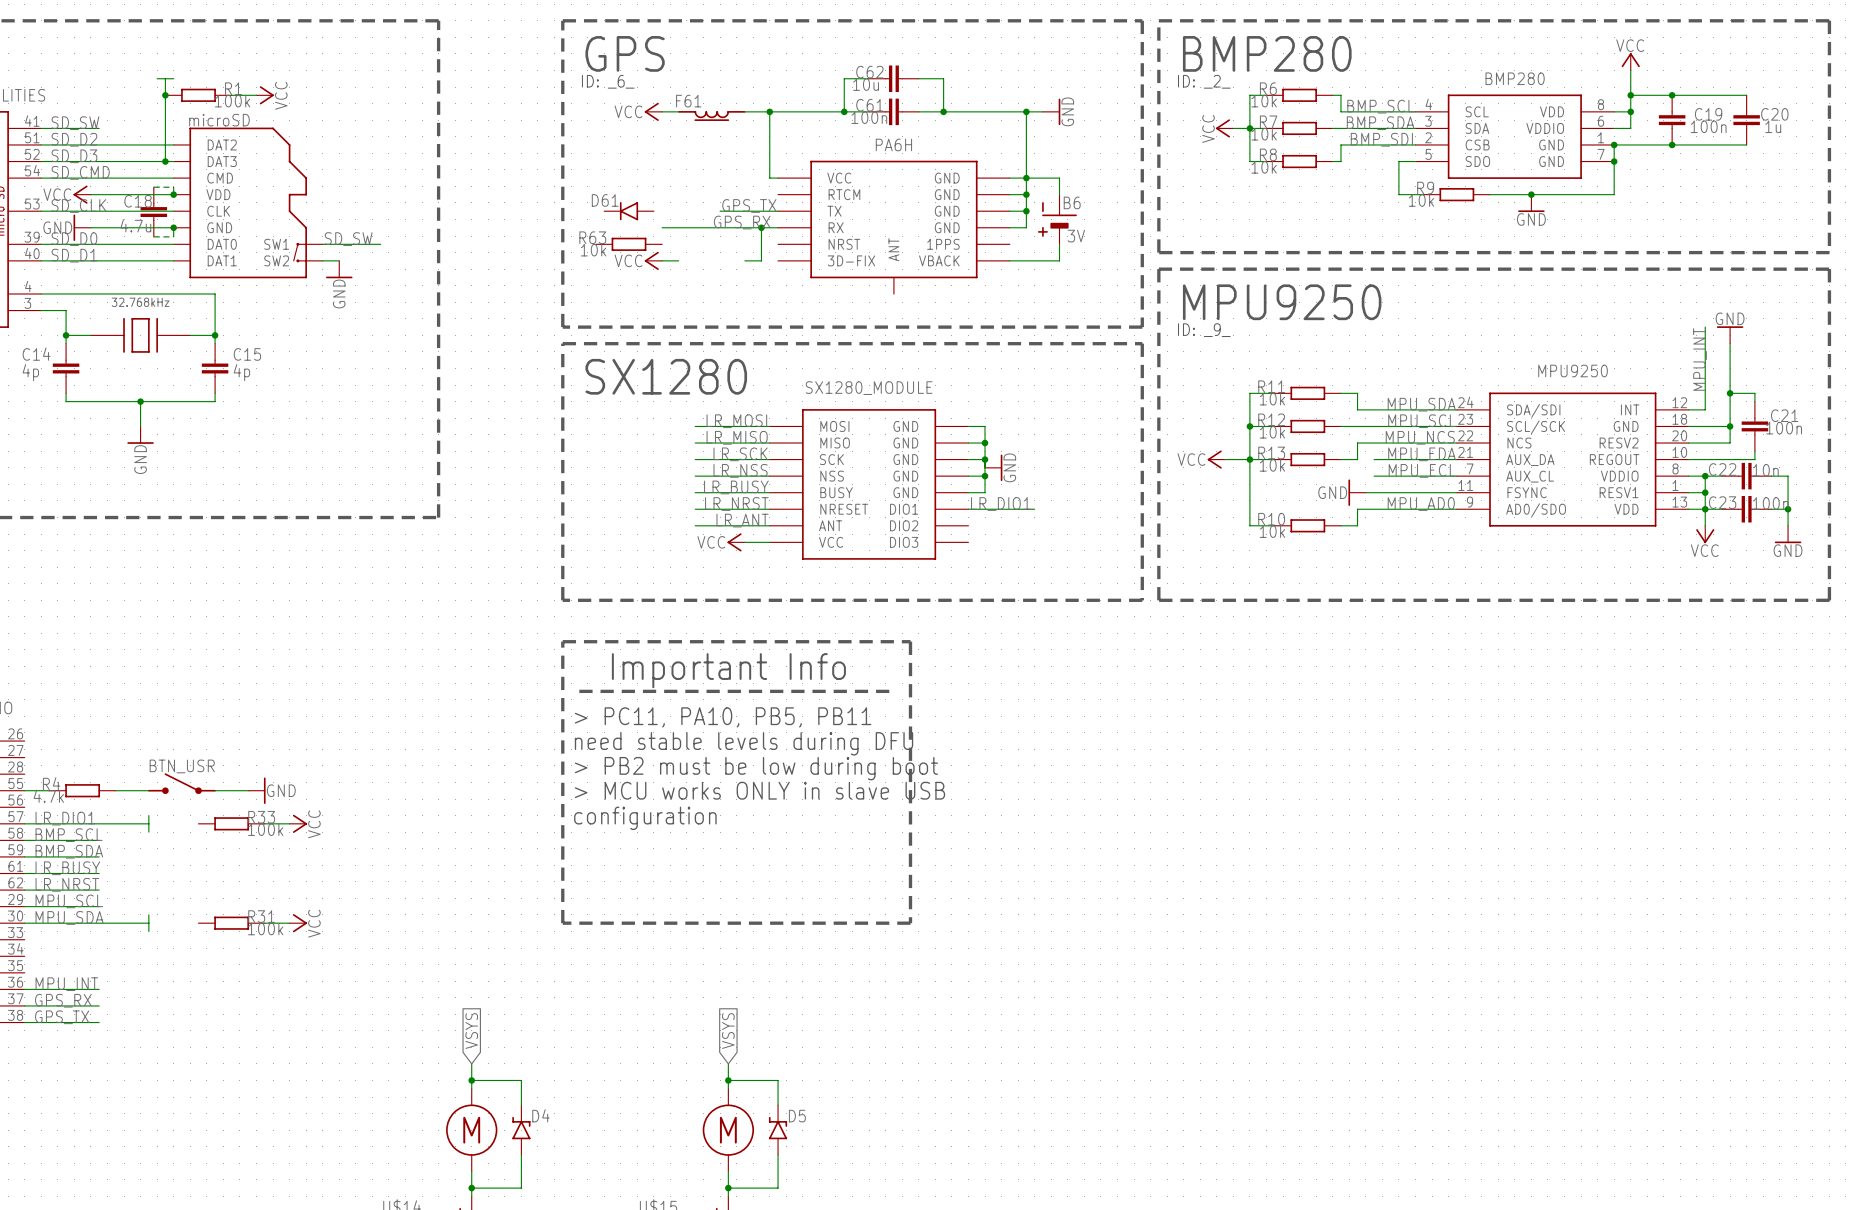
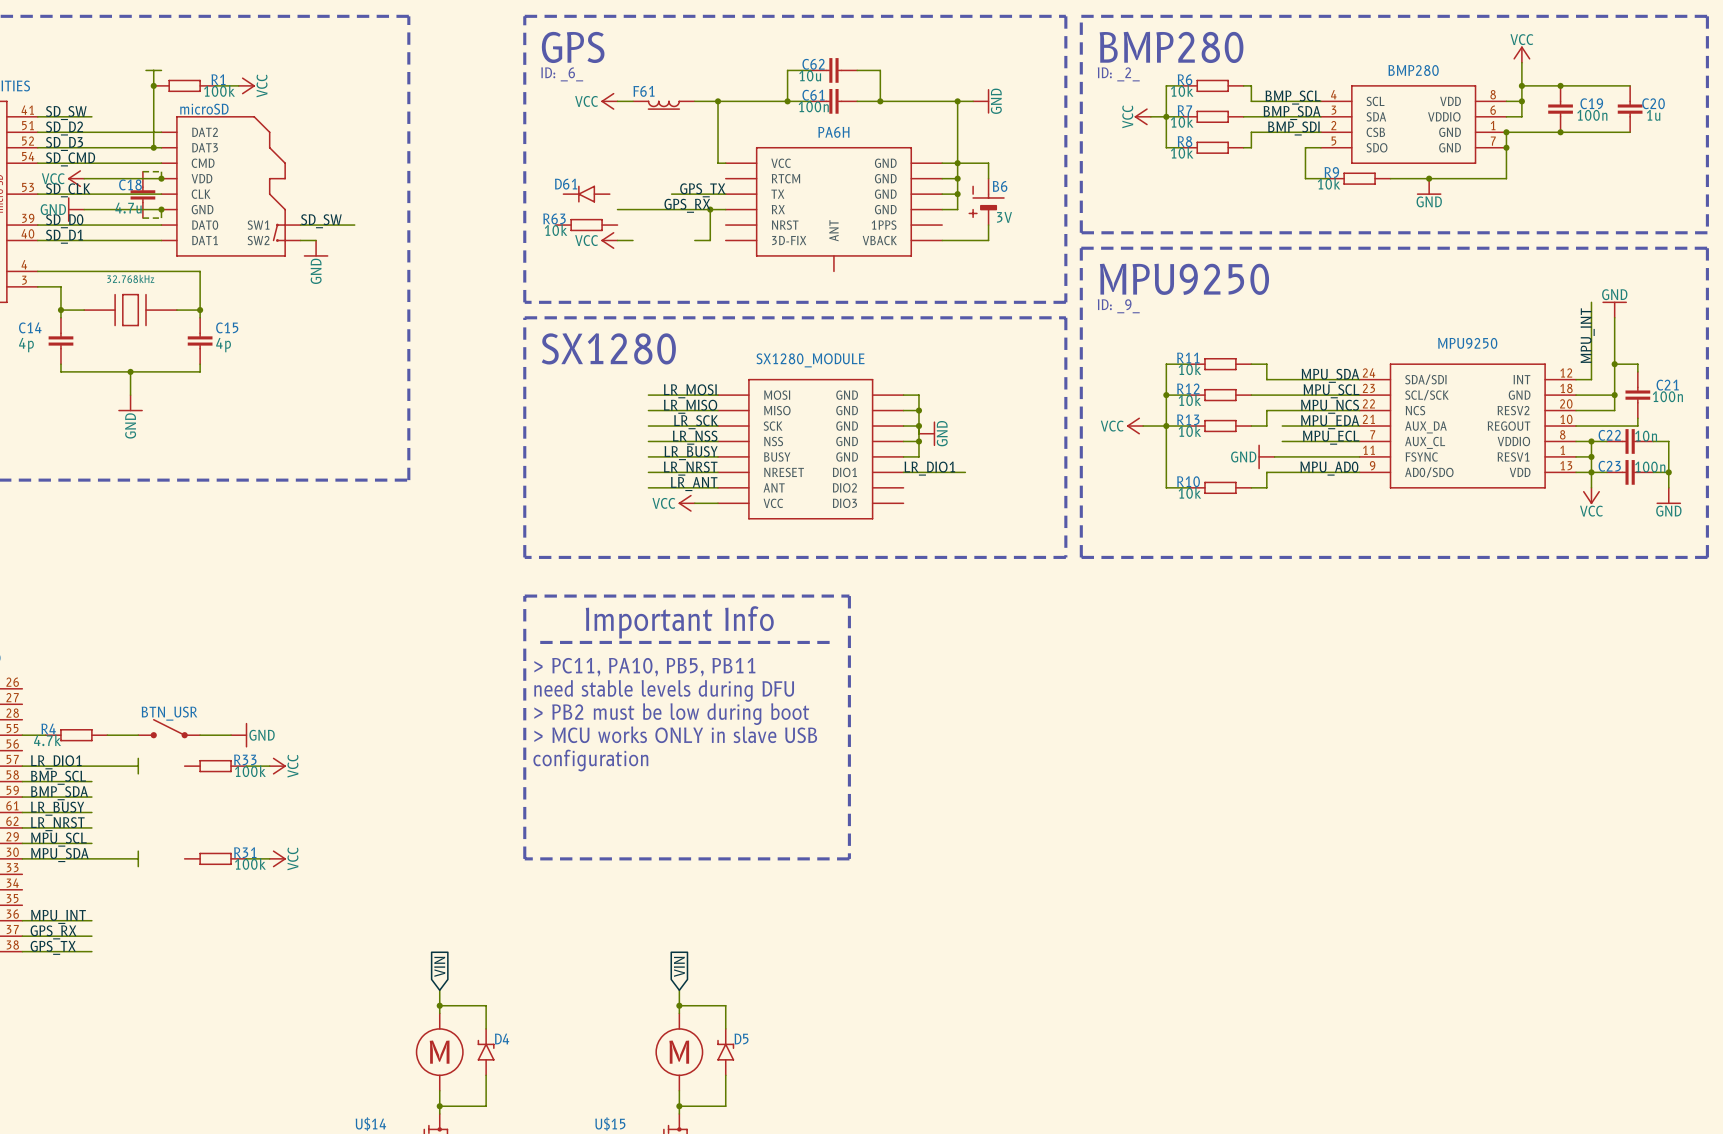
global label: VSYS (471, 1031) -> VIN (439, 966)
global label: VSYS (728, 1031) -> VIN (679, 966)

